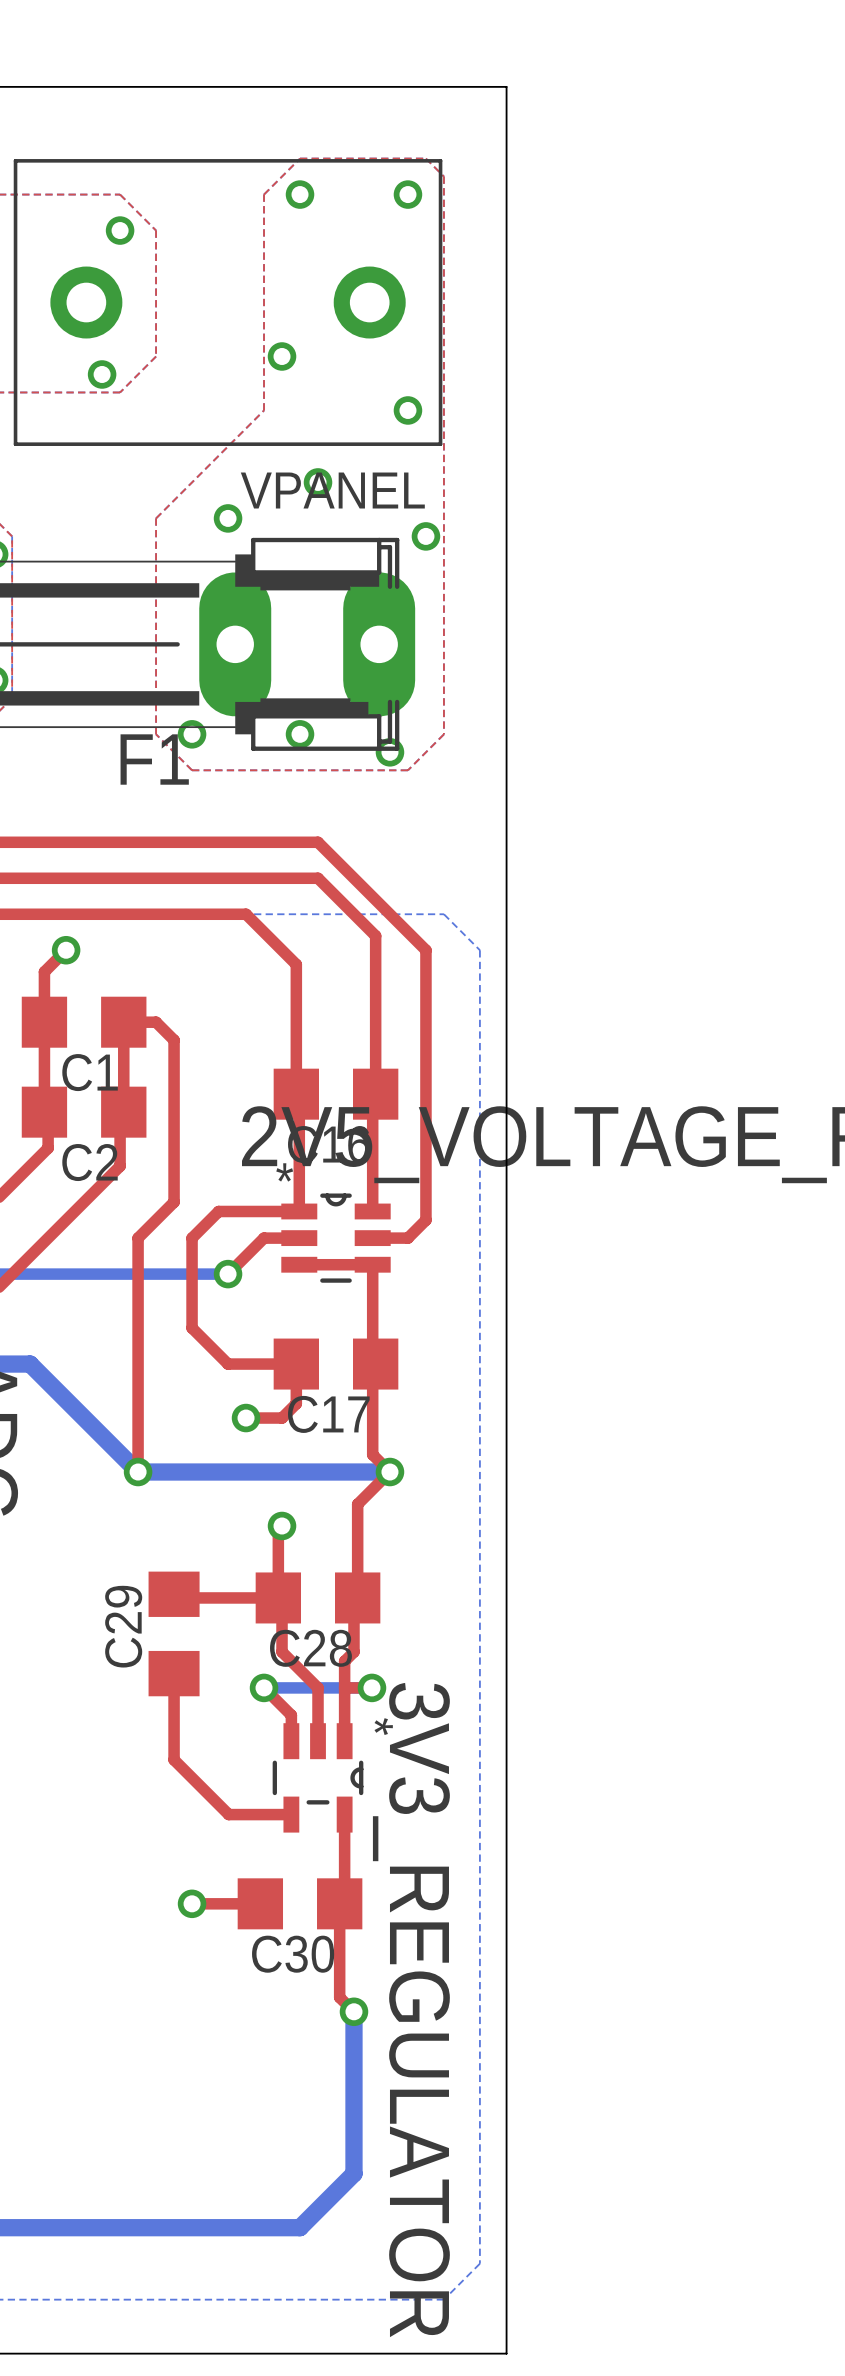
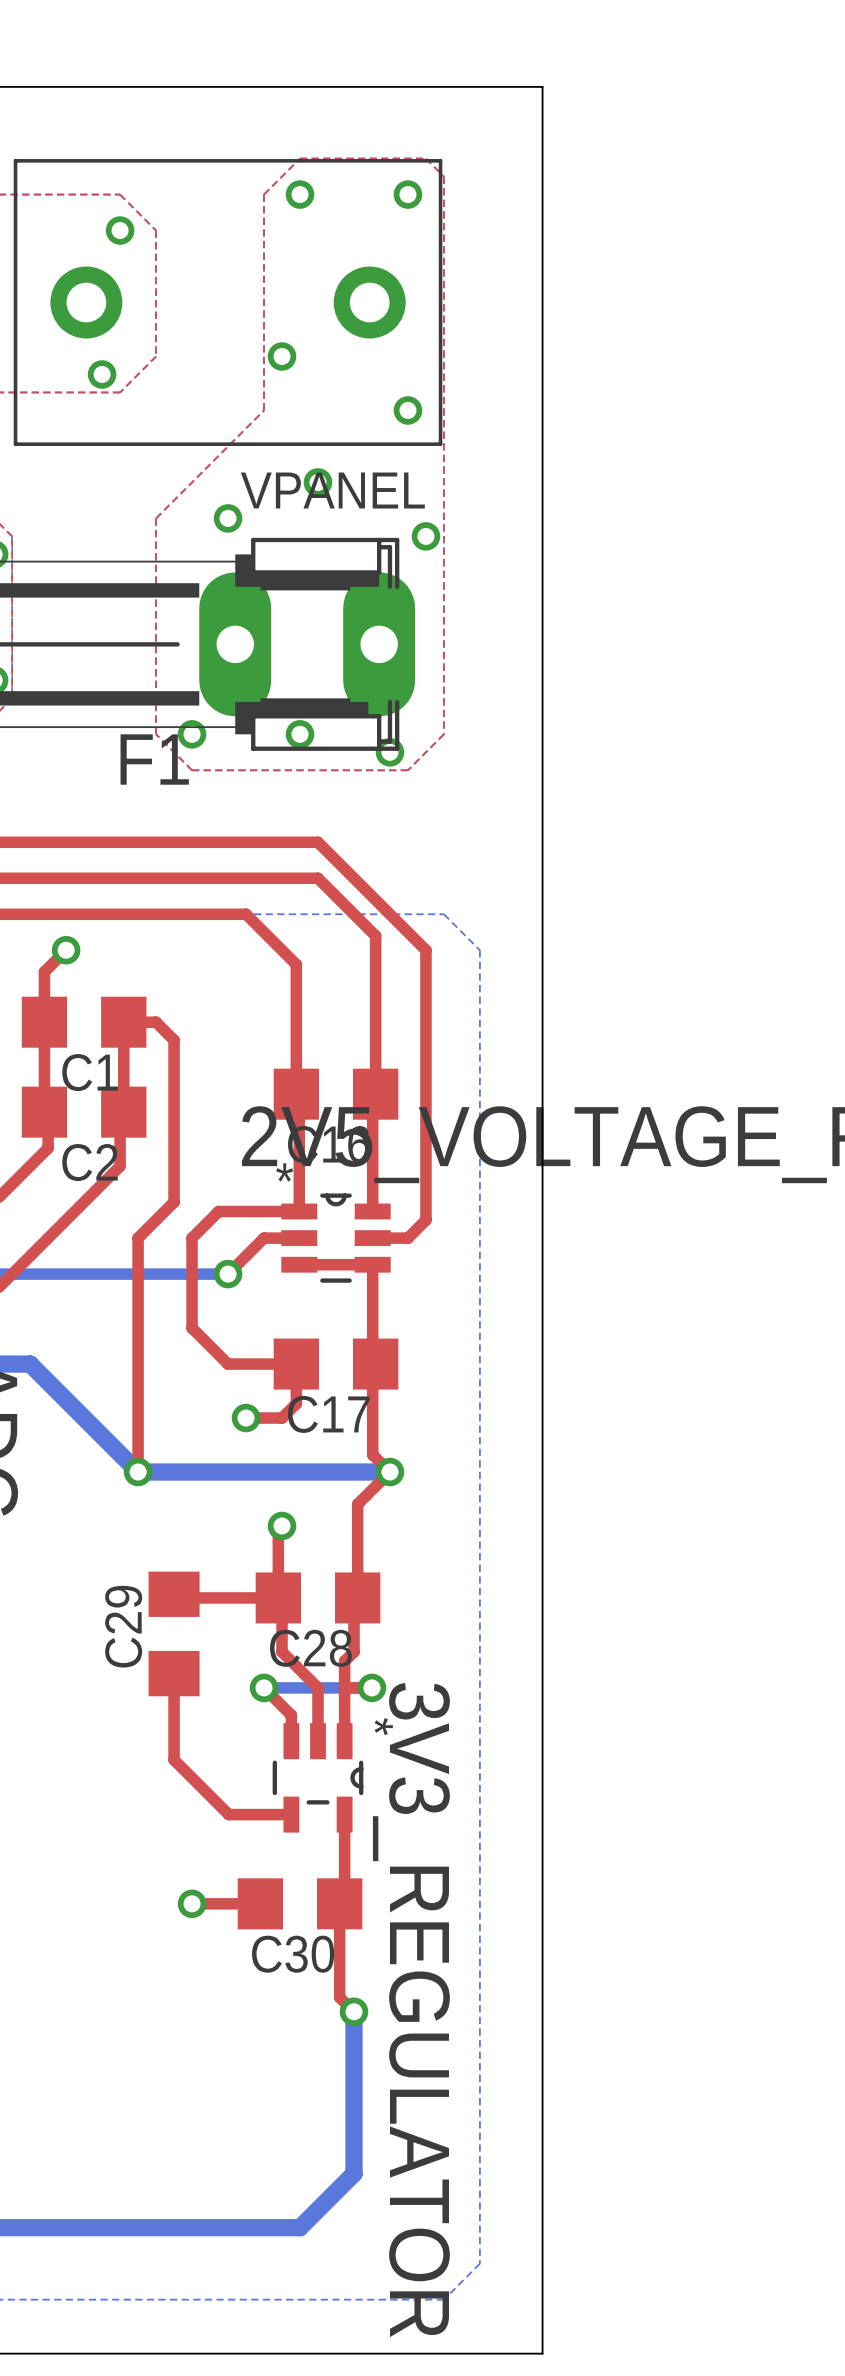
board edge: (506, 86) (506, 2353) -> (506, 86) (542, 86) (542, 2353) (506, 2353)

